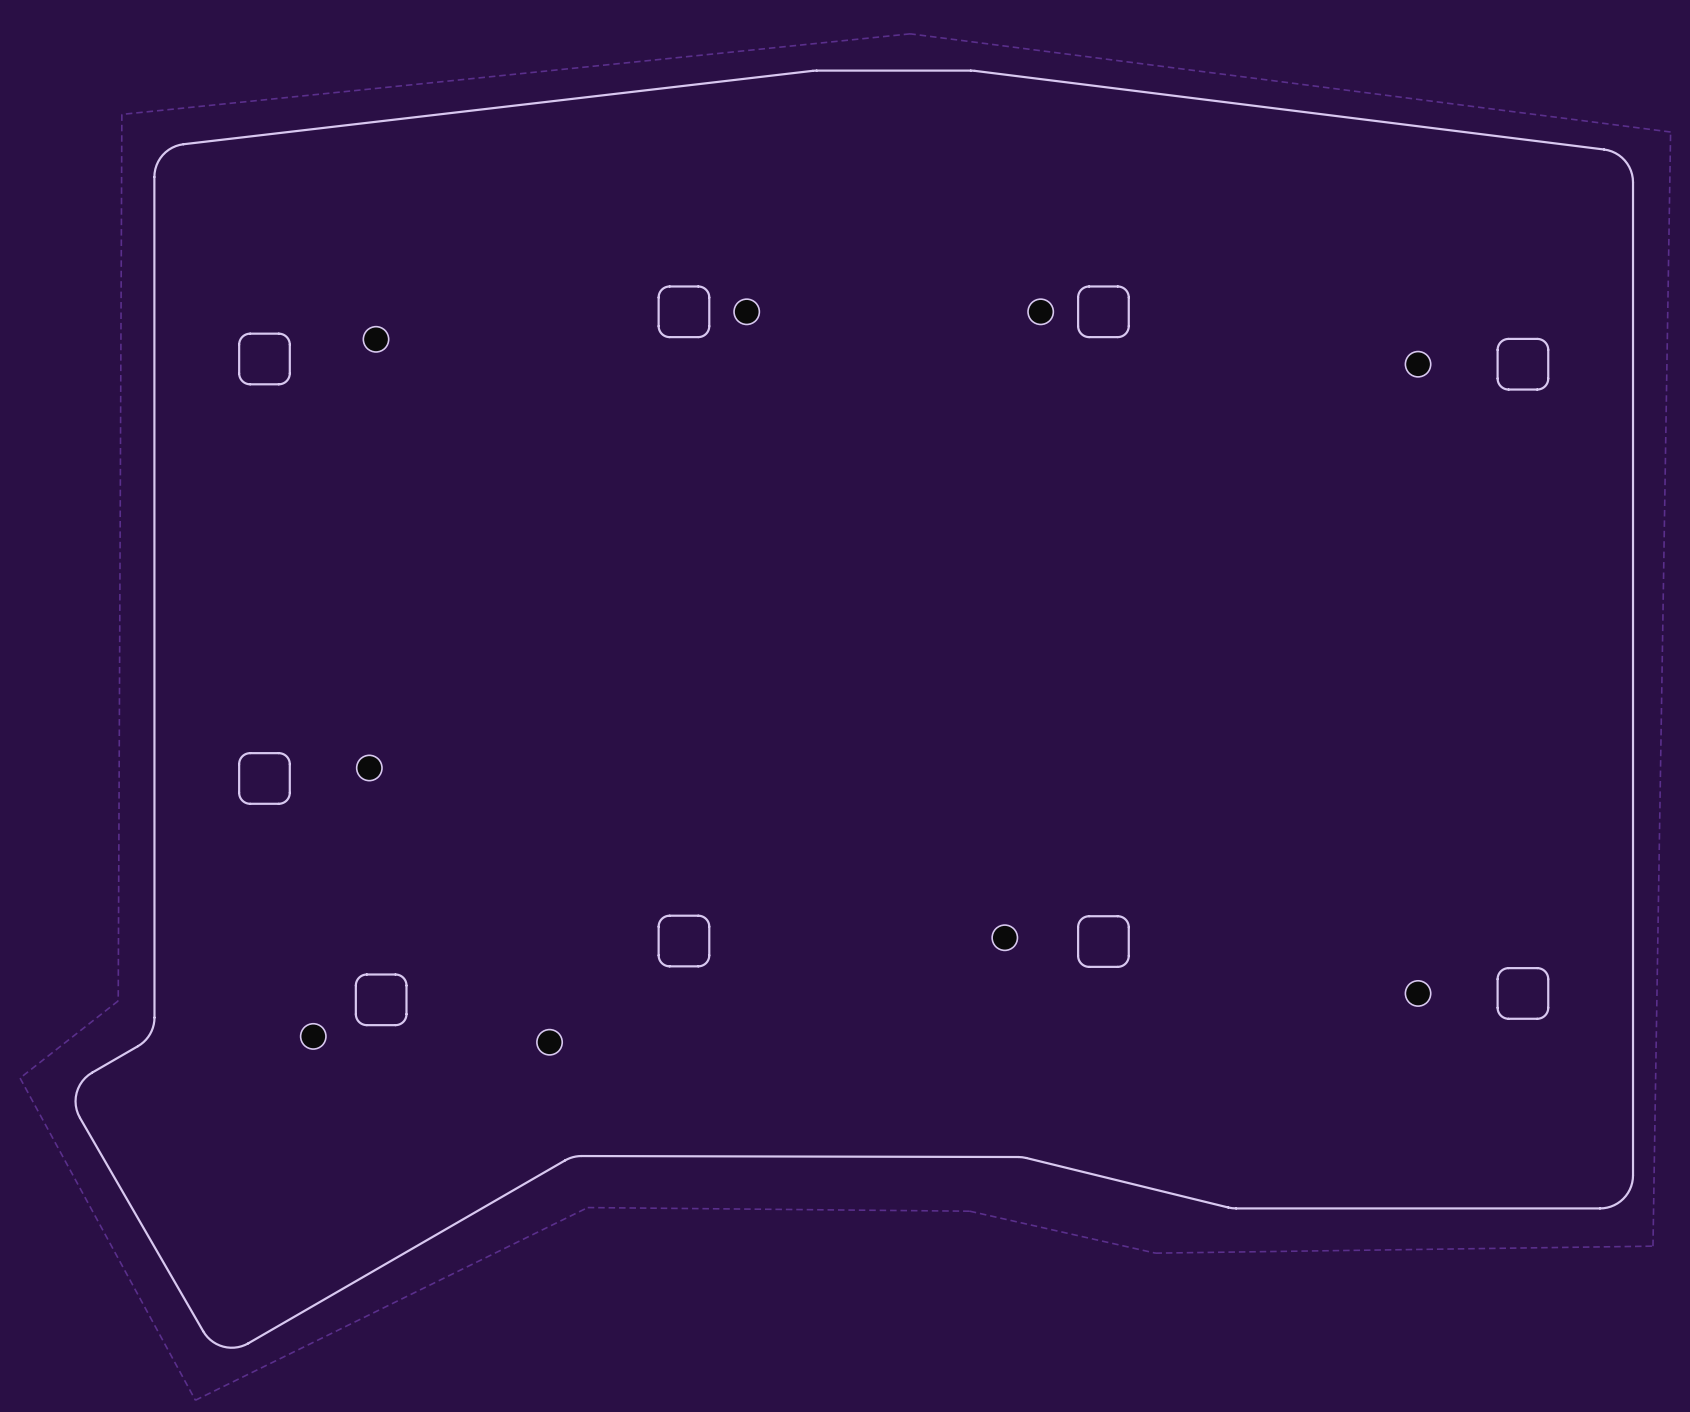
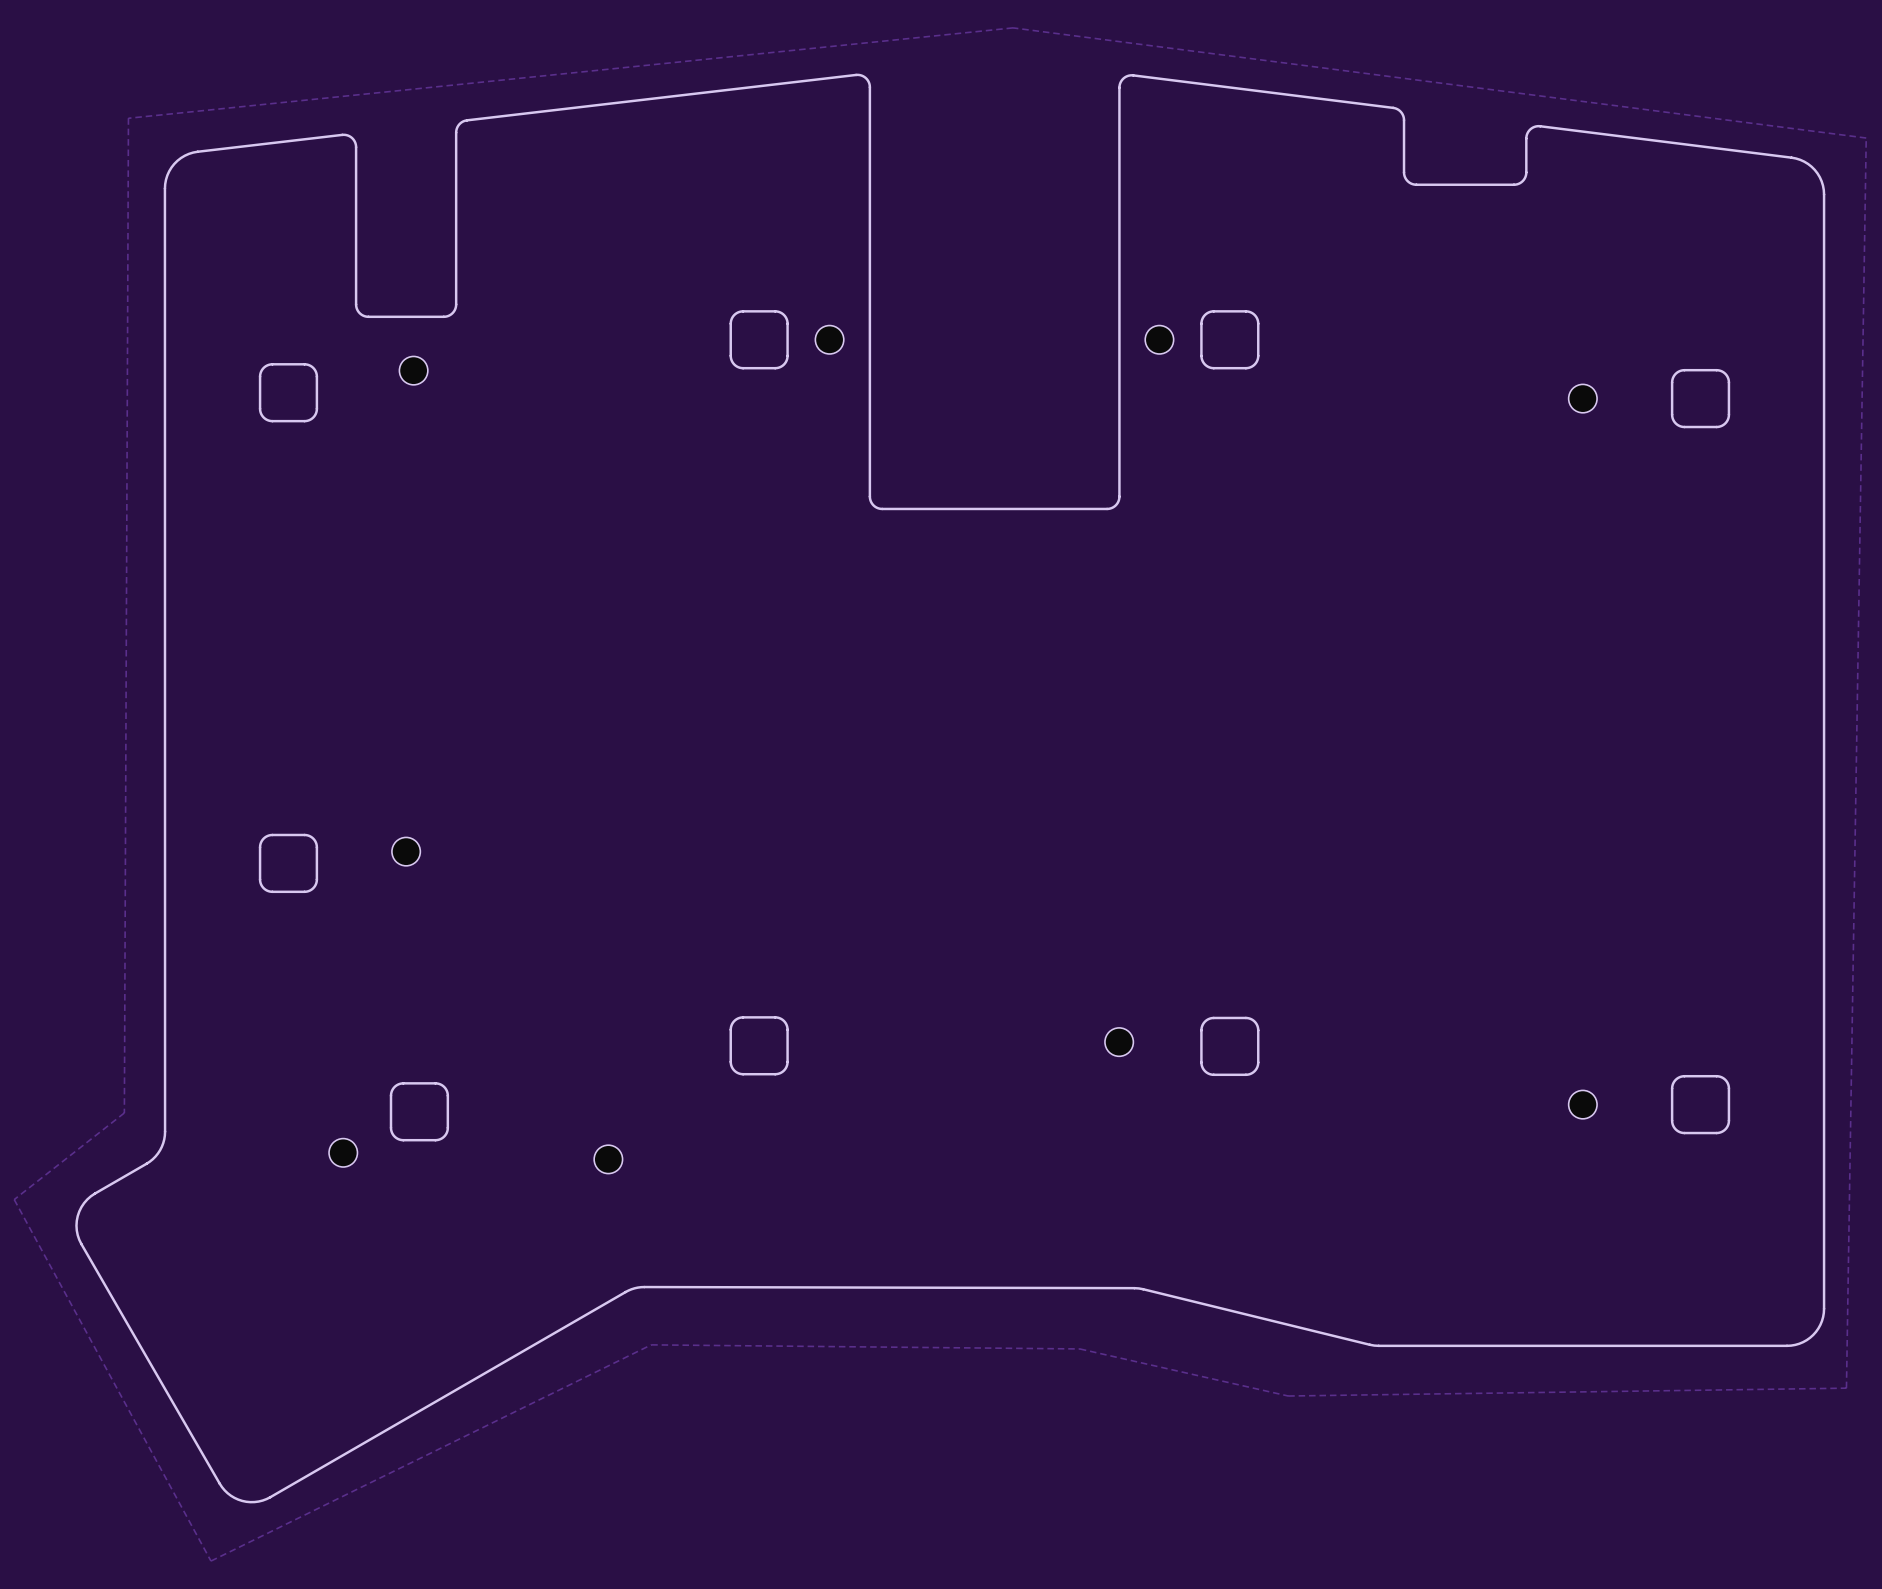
board edge: (770, 75) (816, 70) (970, 70) (1017, 76) -> (856, 74) (865, 77) (869, 87) (869, 496) (873, 505) (882, 508) (1107, 508) (1113, 507) (1117, 502) (1119, 496) (1119, 87) (1123, 78) (1133, 75)
board edge: (1249, 105) (1380, 121) -> (1393, 107) (1399, 110) (1403, 118) (1404, 175) (1407, 181) (1414, 184) (1518, 183) (1523, 179) (1526, 174) (1527, 134) (1531, 128) (1540, 126)
board edge: (423, 116) (312, 129) -> (467, 120) (459, 124) (456, 132) (456, 305) (452, 313) (445, 316) (367, 316) (357, 311) (356, 304) (356, 145) (351, 137) (342, 134)

